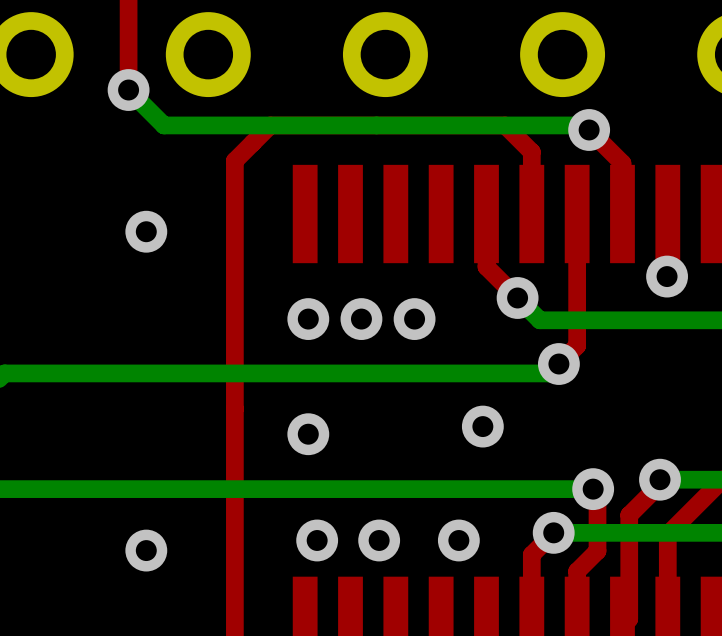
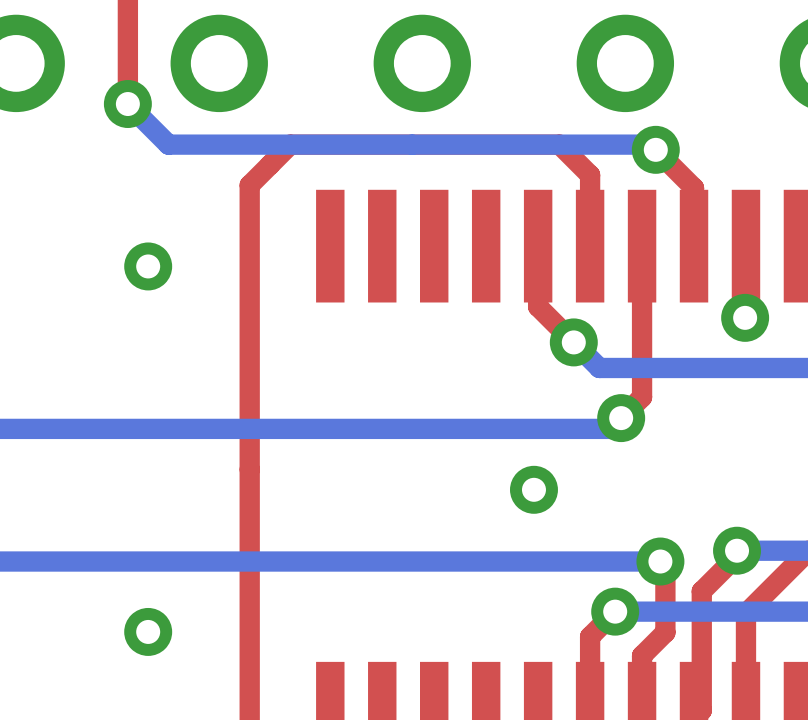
via: (308, 319) -> none
via: (361, 319) -> none
via: (414, 319) -> none
via: (308, 434) -> none
via: (317, 540) -> none
via: (379, 540) -> none
via: (458, 540) -> none

